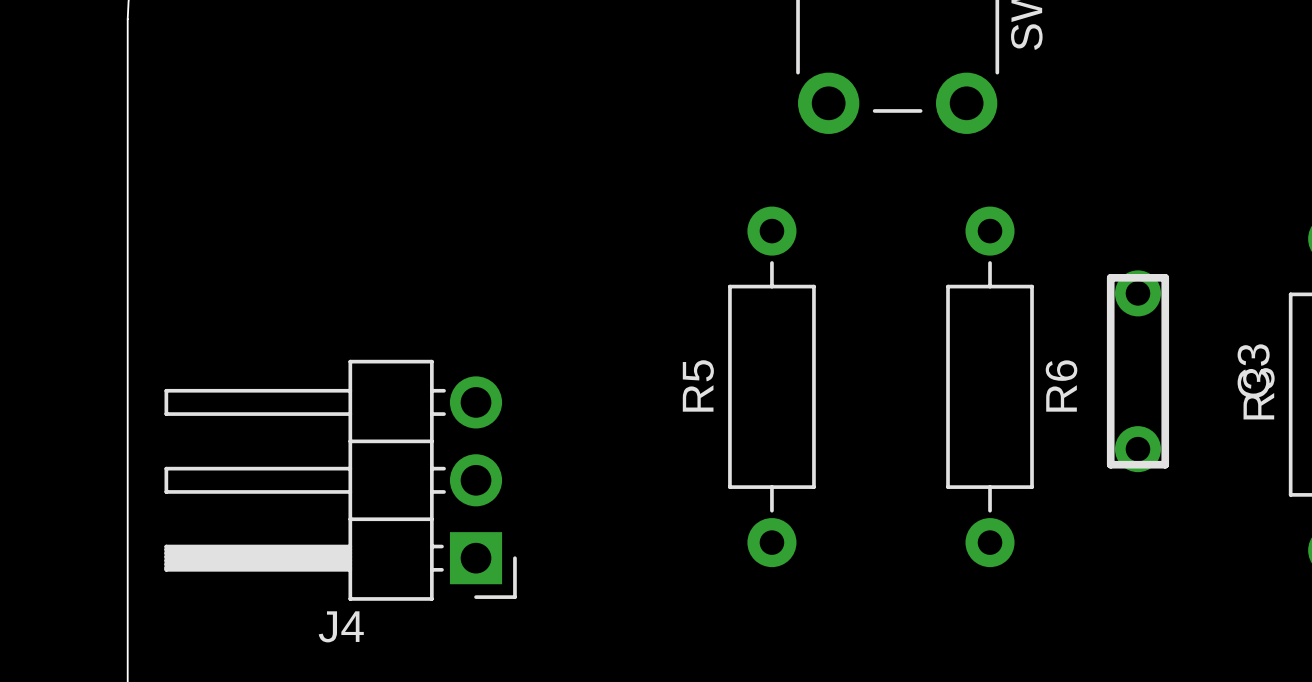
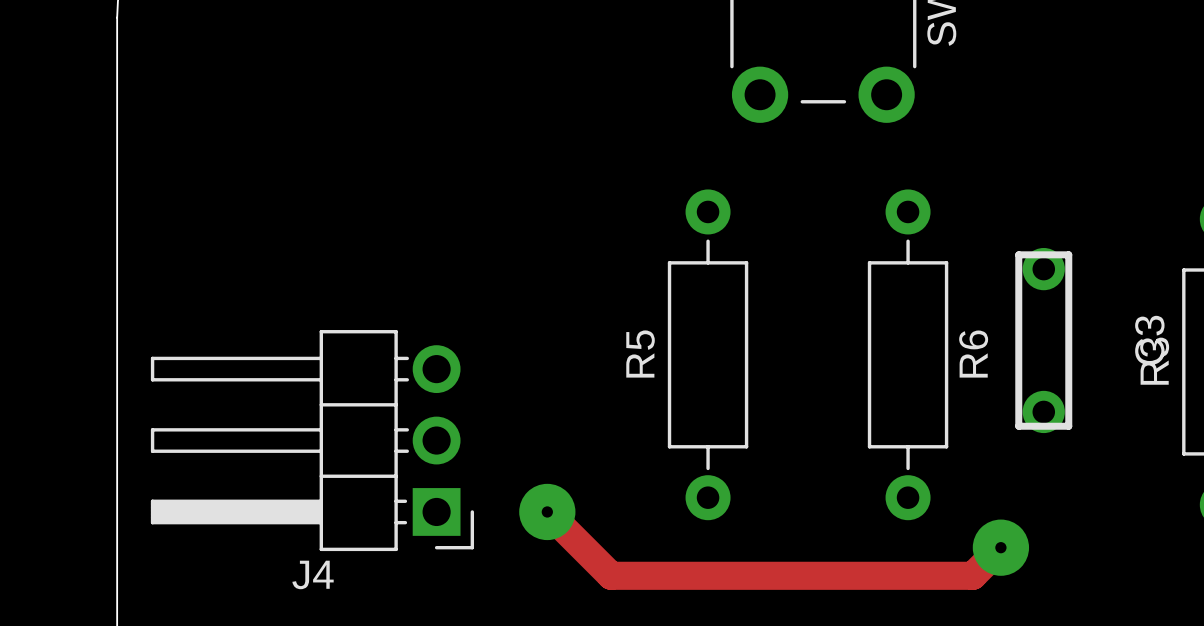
track: none -> (547, 511) (611, 575) (972, 575) (1000, 547)
via: none -> (547, 511)
via: none -> (1000, 547)

